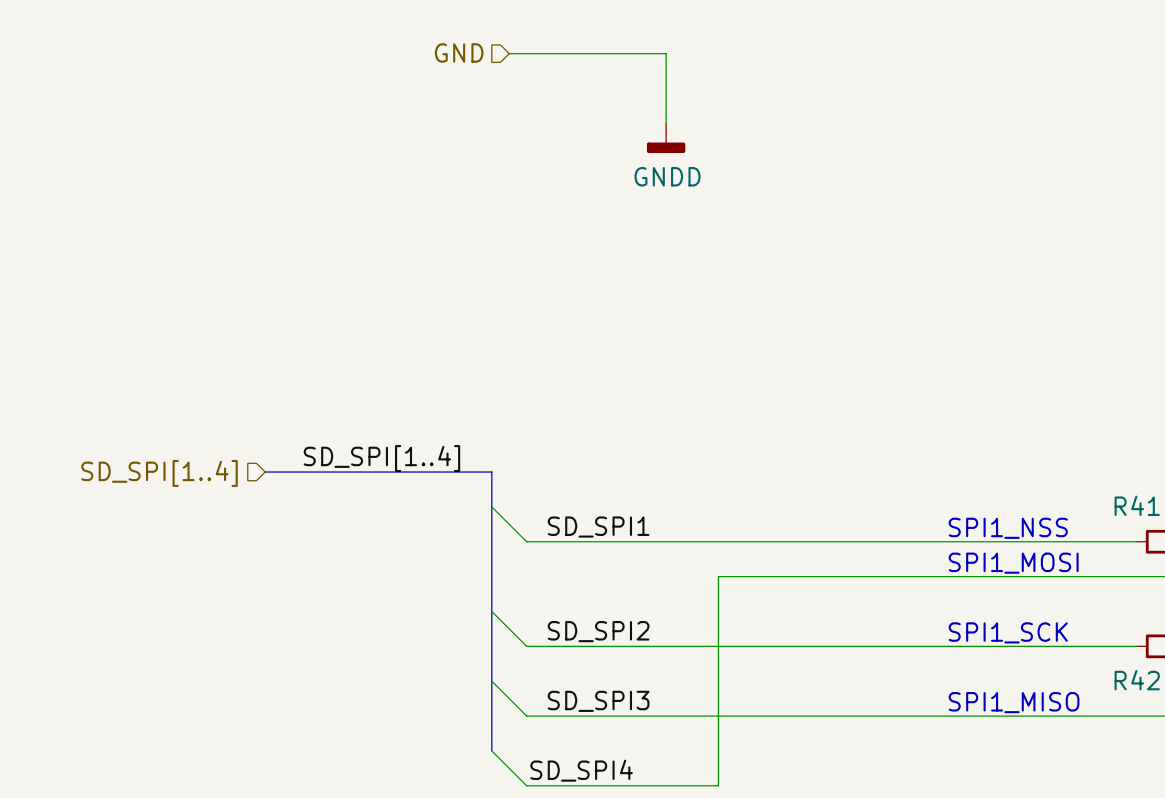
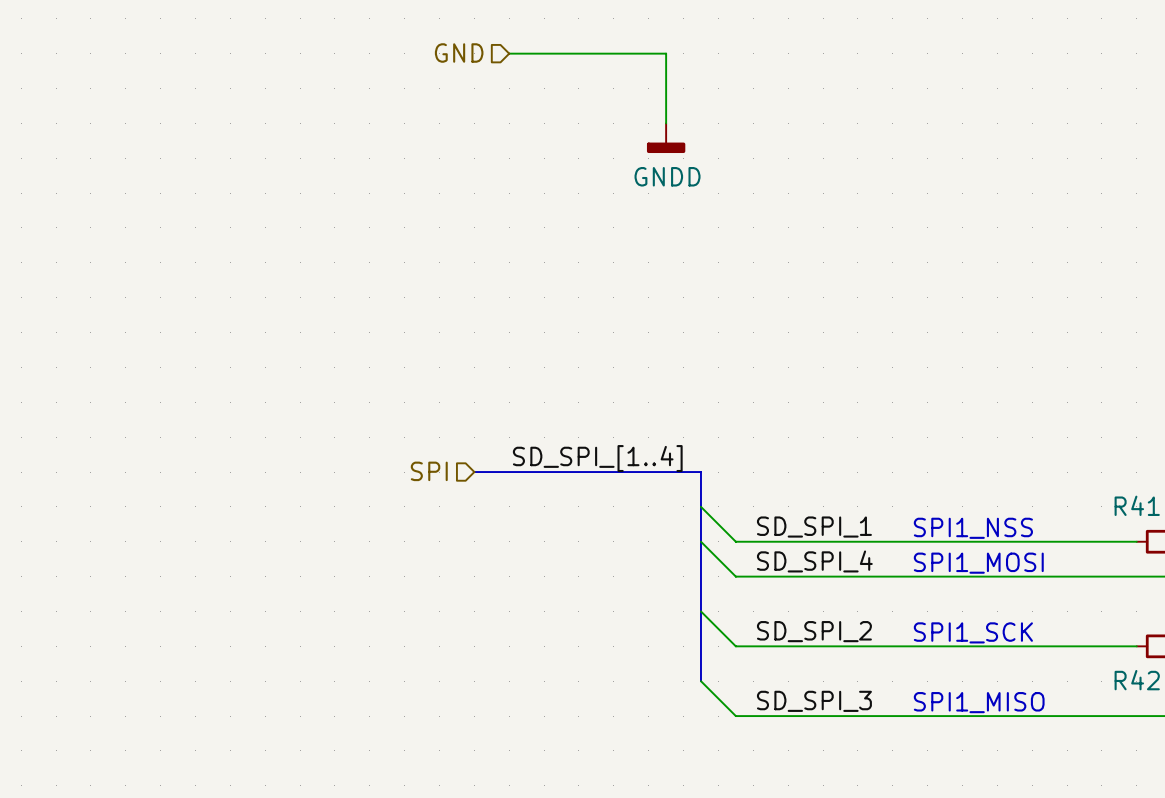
label: SD_SPI[1..4] (381, 458) -> none
label: none -> SD_SPI_[1..4] (597, 458)
hierarchical label: none -> SPI (429, 471)
bus: (265, 472) (474, 472) -> none
bus: (491, 472) (491, 750) -> (491, 472) (700, 472) (700, 681)
hierarchical label: SD_SPI[1..4] (159, 473) -> none
wire: (491, 506) (526, 541) (735, 541) -> (700, 506) (735, 541)
label: SD_SPI1 (598, 527) -> none
label: none -> SD_SPI_1 (814, 527)
text position: SPI1_NSS (1008, 528) -> SPI1_NSS (973, 528)
label: none -> SD_SPI_4 (814, 561)
text position: SPI1_MOSI (1013, 563) -> SPI1_MOSI (978, 563)
wire: (735, 576) (718, 576) (718, 785) (526, 785) (491, 750) -> (735, 576) (700, 541)
wire: (491, 611) (526, 646) (735, 646) -> (700, 611) (735, 646)
label: SD_SPI2 (598, 631) -> none
label: none -> SD_SPI_2 (814, 631)
text position: SPI1_SCK (1008, 632) -> SPI1_SCK (973, 632)
wire: (491, 681) (526, 716) (735, 716) -> (700, 681) (735, 716)
label: SD_SPI3 (598, 701) -> none
label: none -> SD_SPI_3 (814, 701)
text position: SPI1_MISO (1014, 702) -> SPI1_MISO (979, 702)
label: SD_SPI4 (581, 770) -> none

